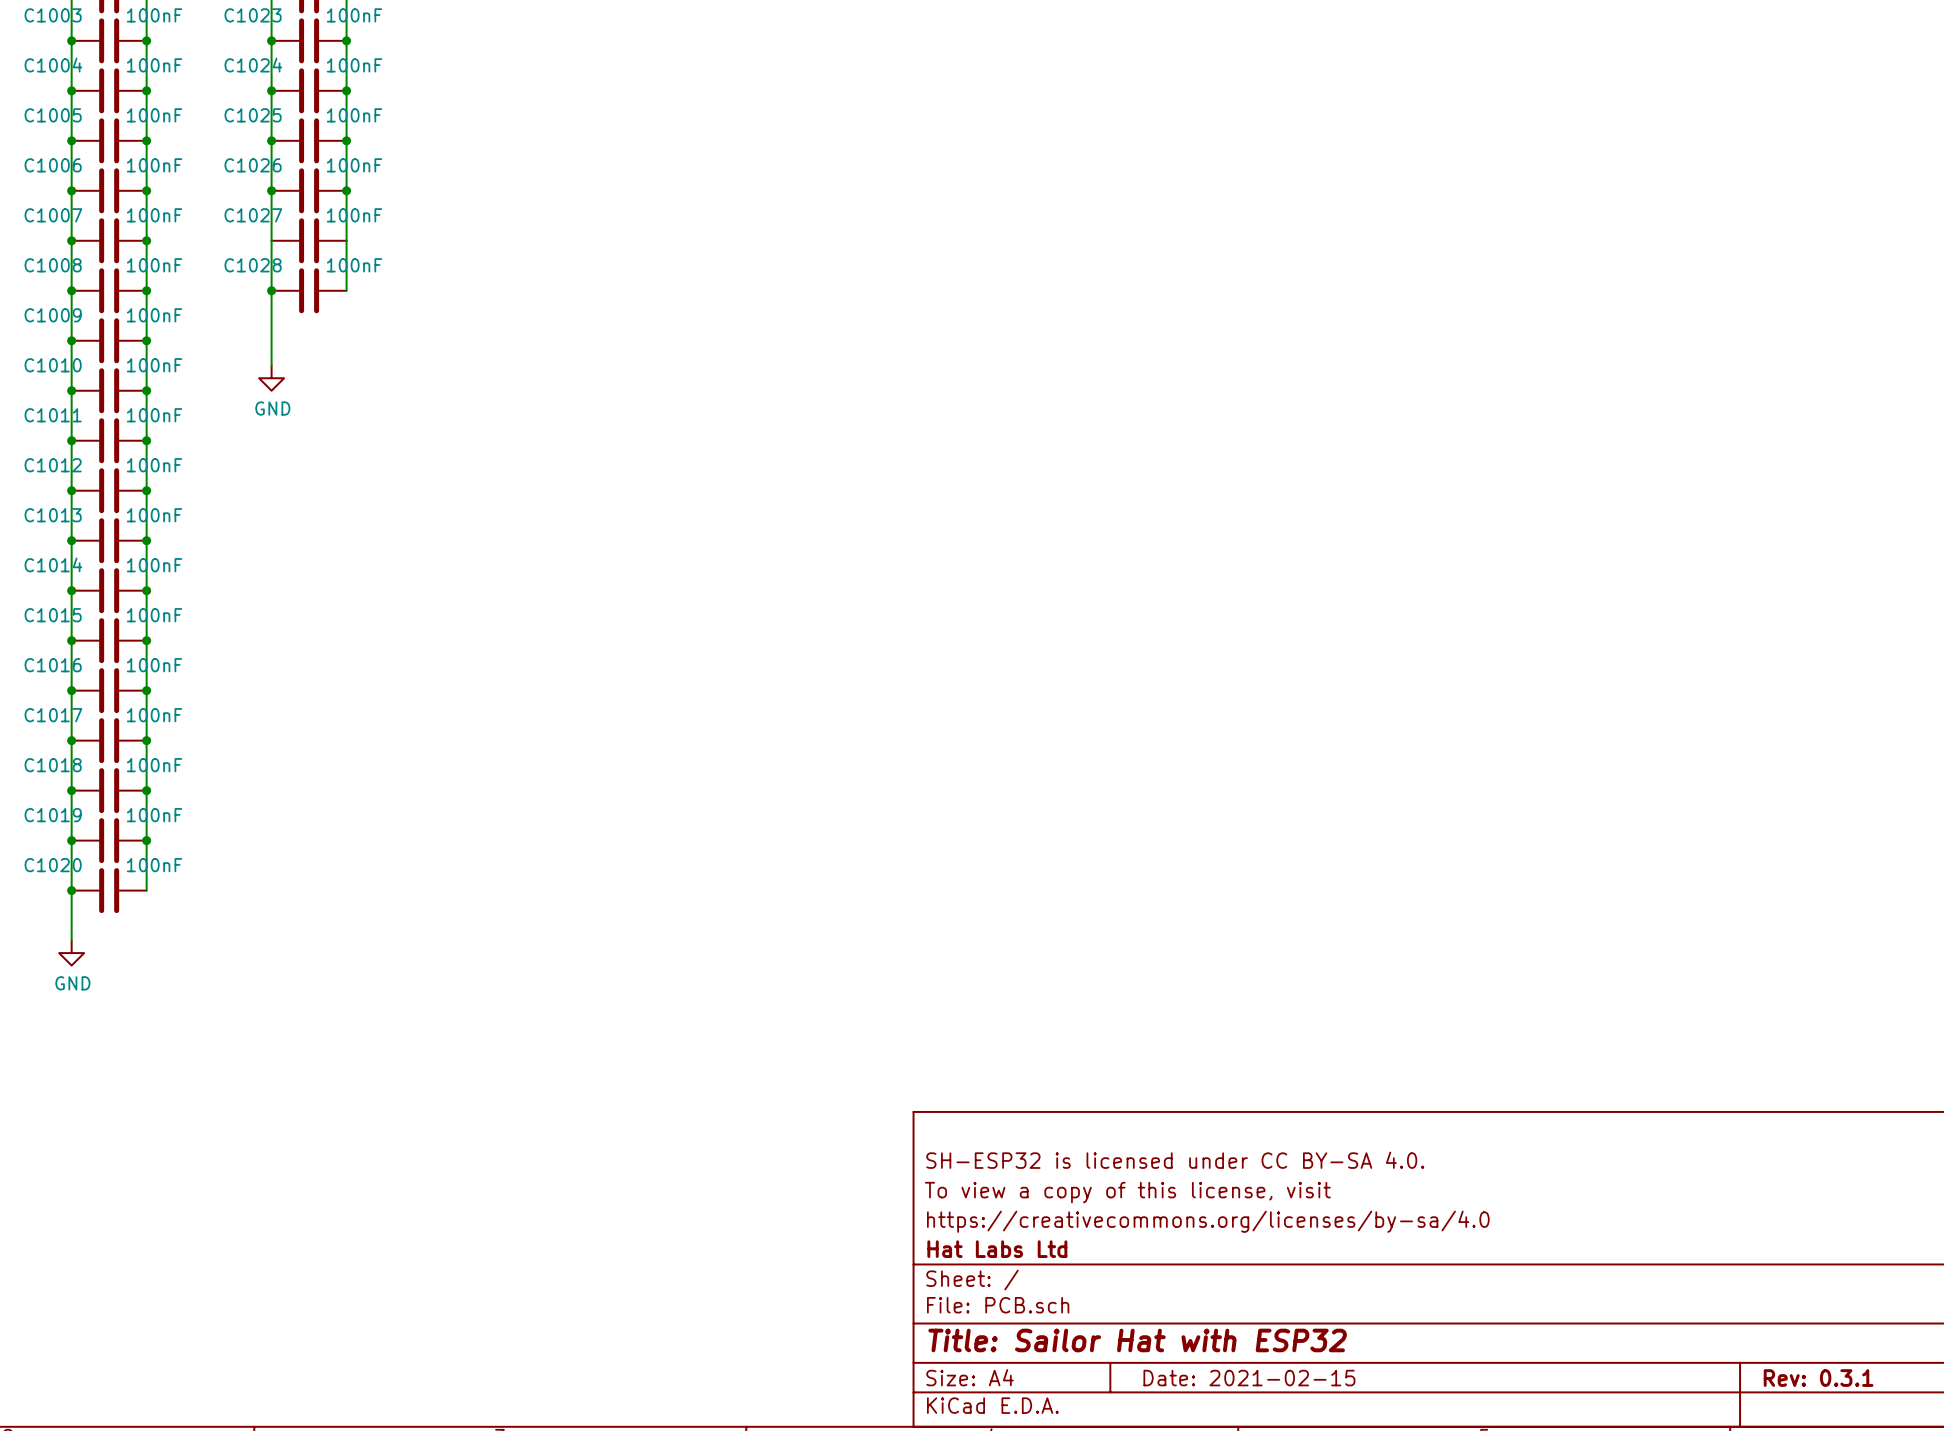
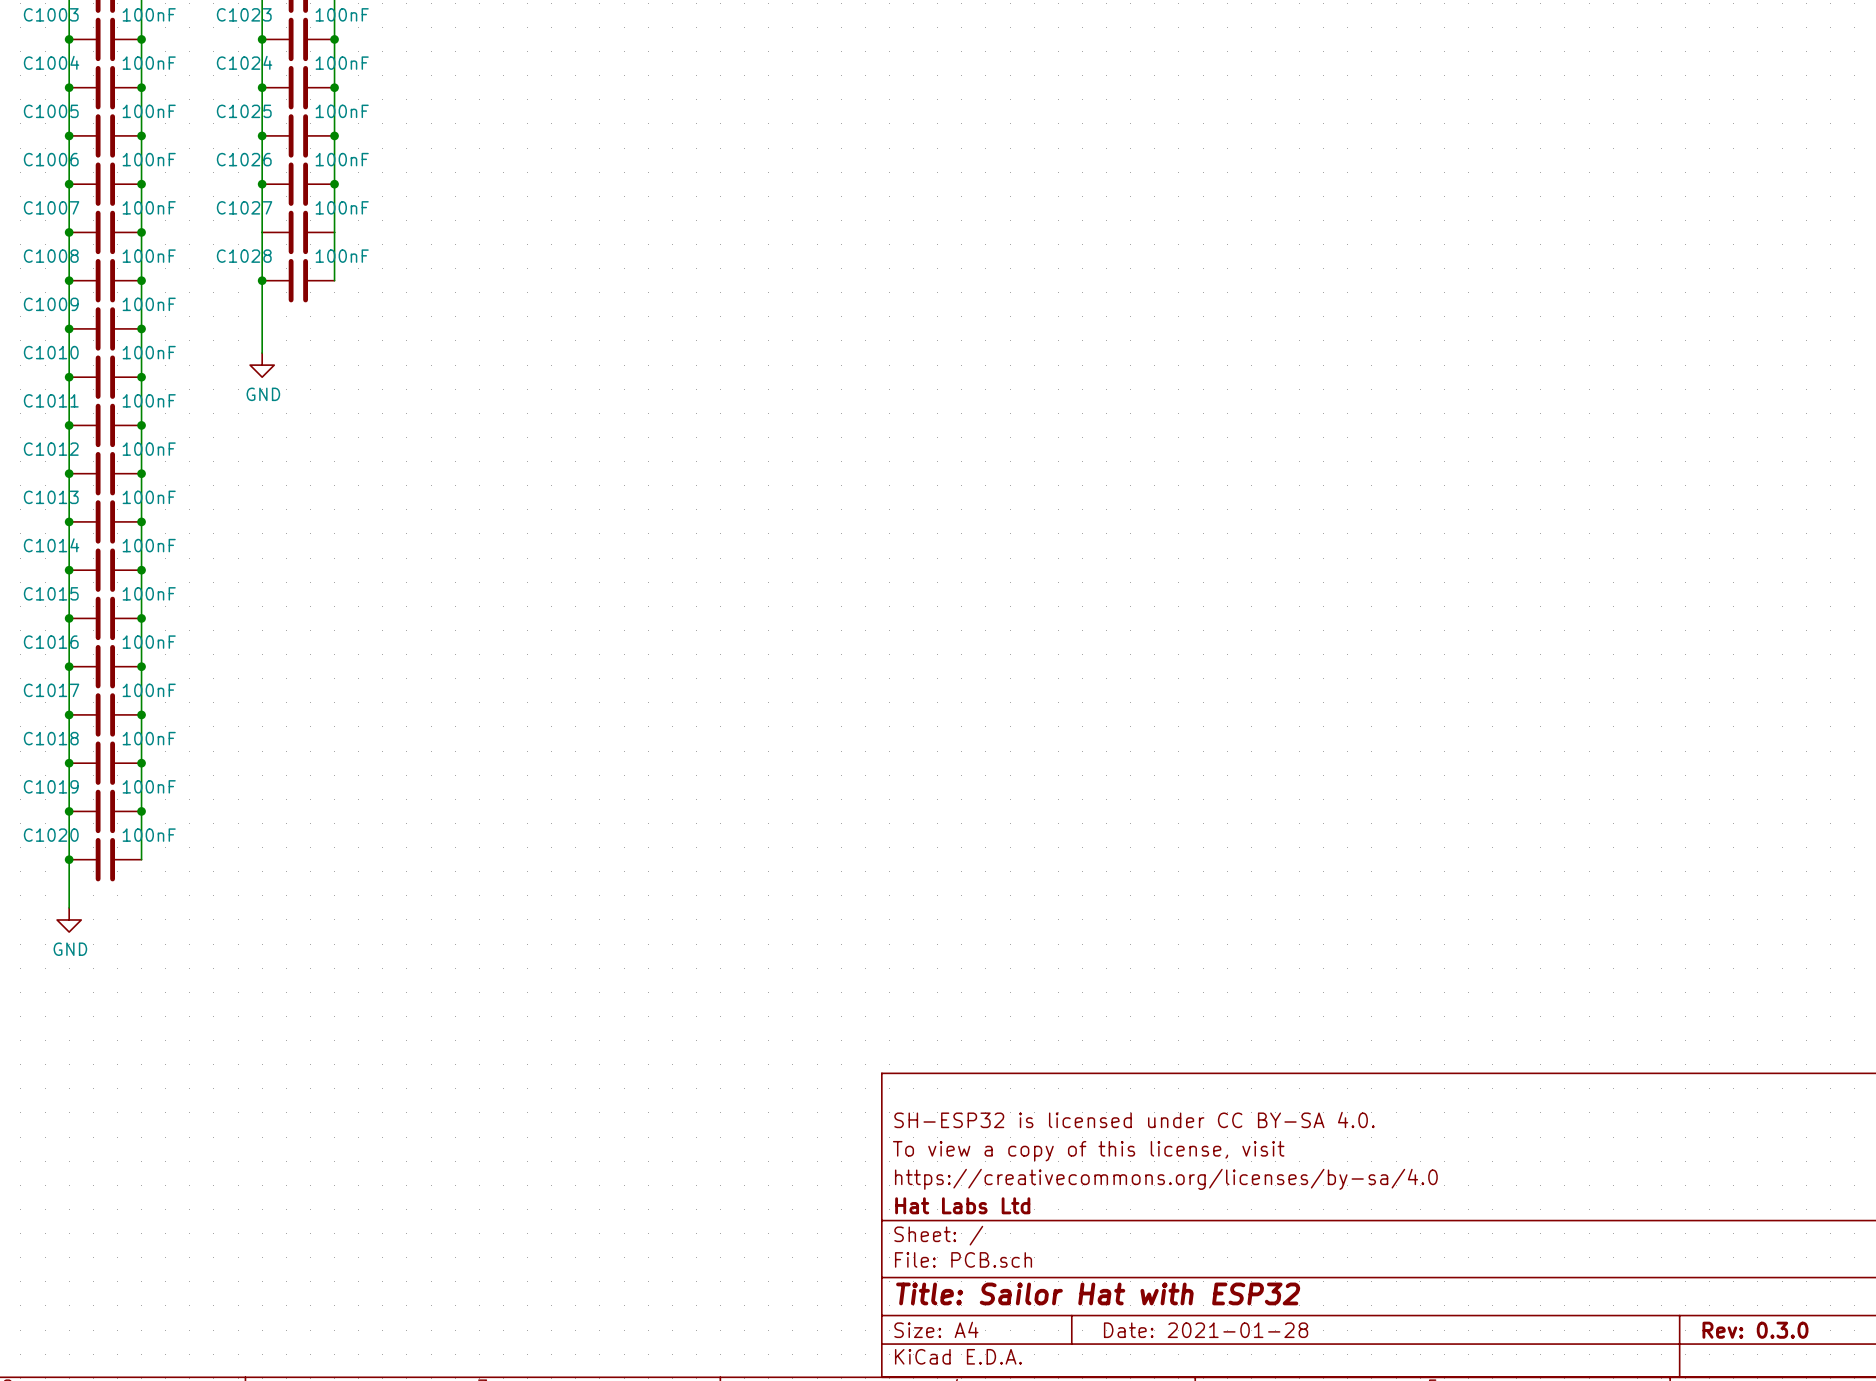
title block: Date: 2021-02-15 (1249, 1378) -> Date: 2021-01-28 (1206, 1330)
title block: Rev: 0.3.1 (1818, 1378) -> Rev: 0.3.0 (1755, 1330)

